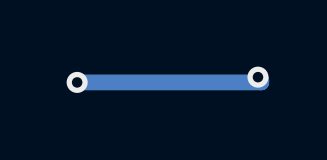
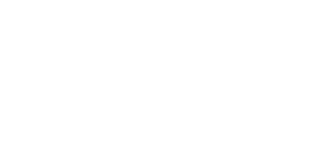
track: (257, 77) (261, 82) (77, 82) -> none
via: (257, 77) -> none
via: (77, 82) -> none

